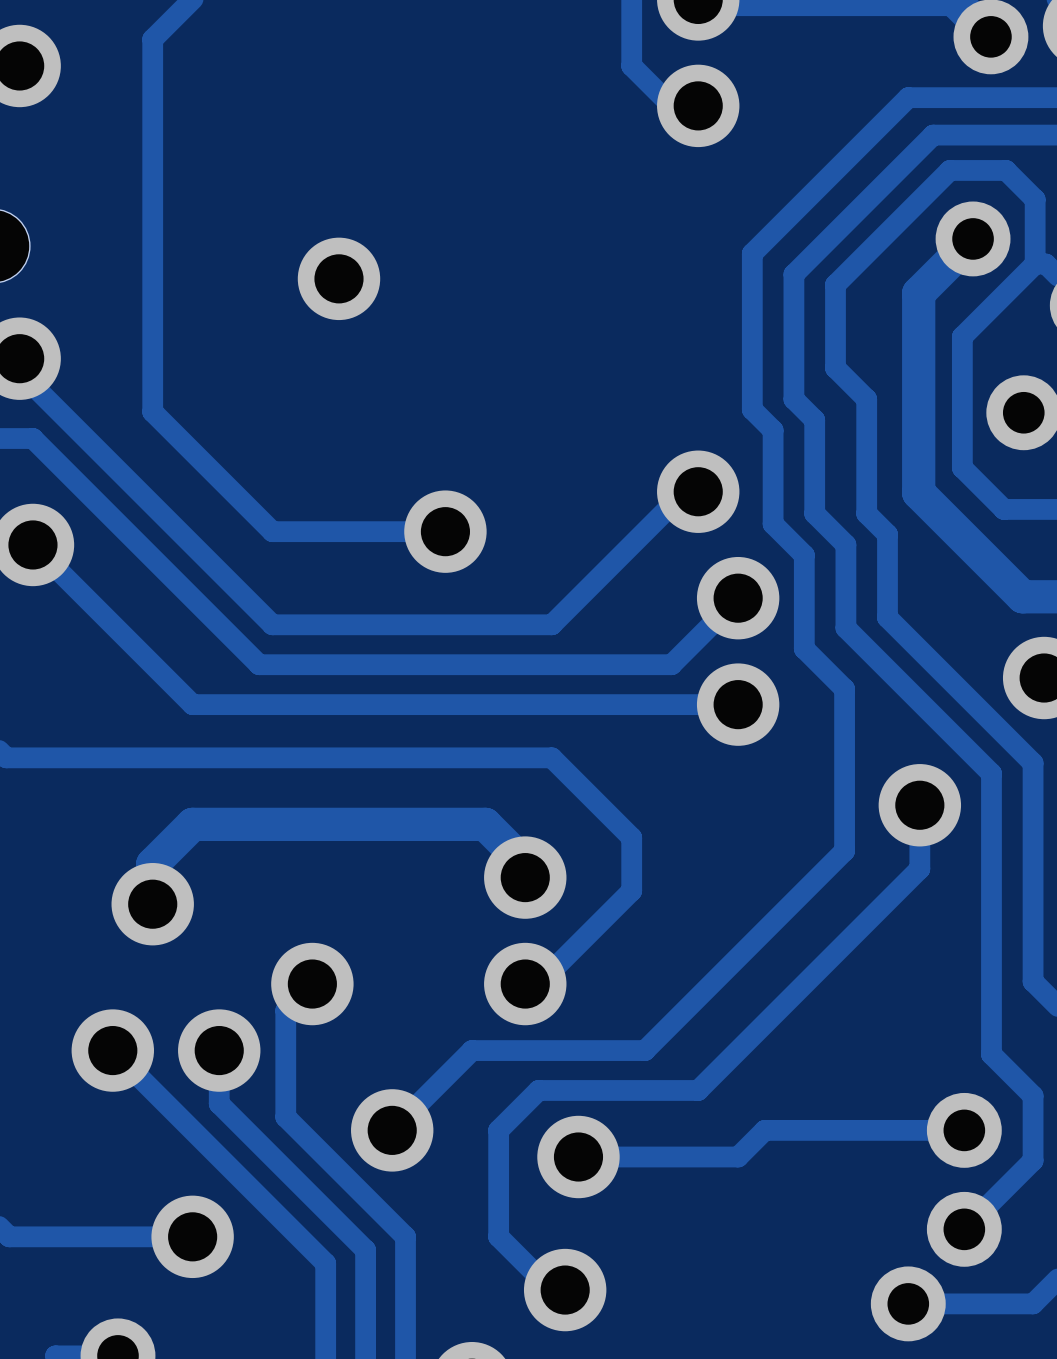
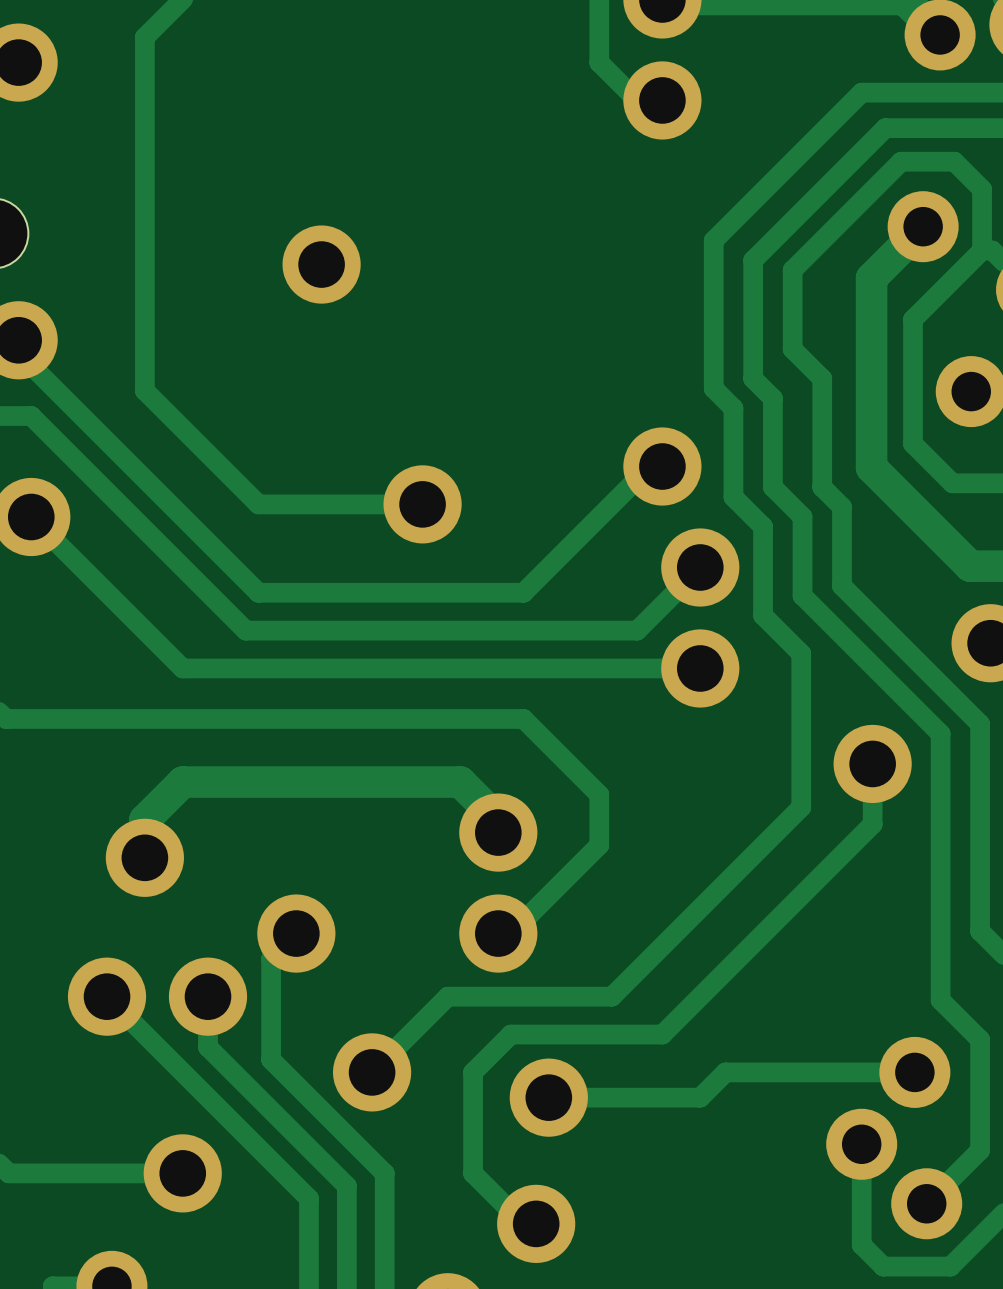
track: (1033, 1160) (964, 1229) -> (980, 1101) (980, 1150) (926, 1203)
via: none -> (861, 1144)
via: (964, 1229) -> none
via: none -> (926, 1203)
via: (908, 1303) -> none
track: (1033, 1303) (908, 1303) -> (980, 1237) (950, 1266) (883, 1266) (861, 1244) (861, 1144)

